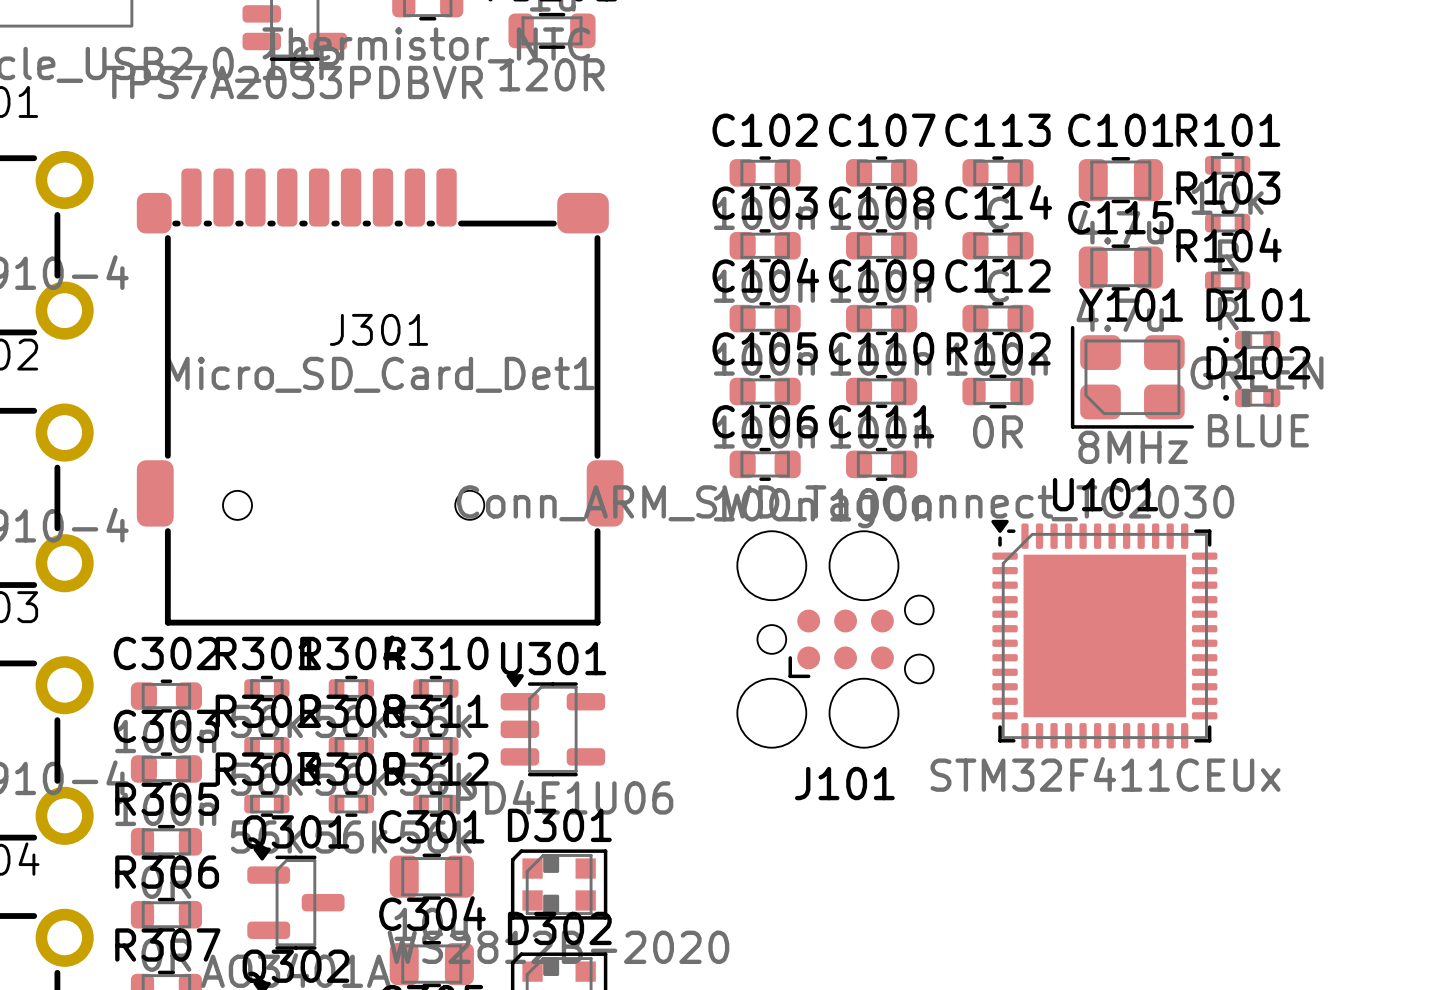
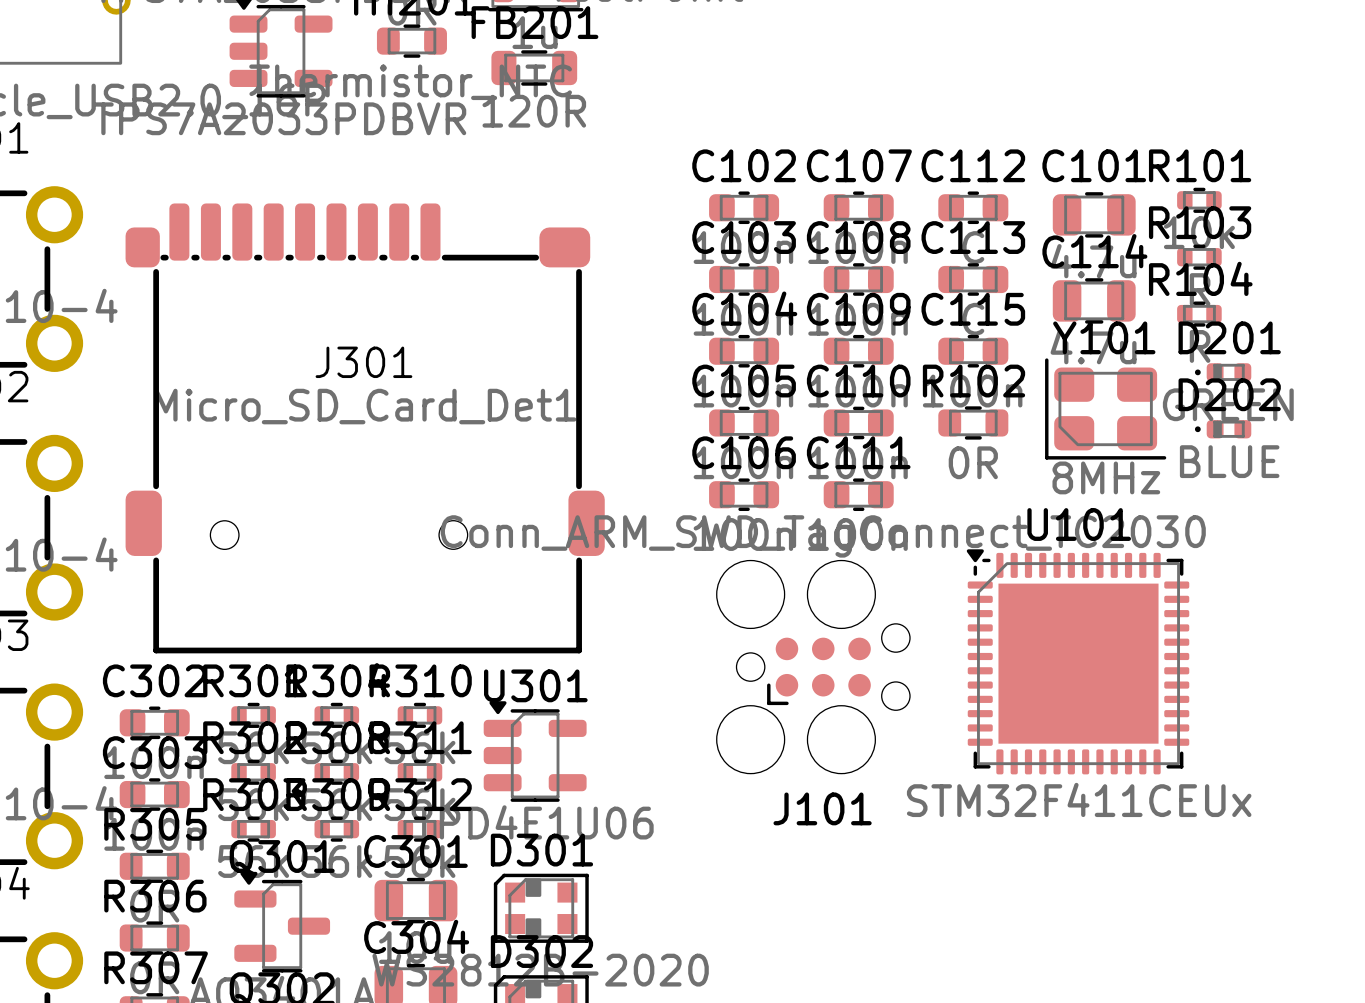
C113 name: C113 (998, 130) -> C112 (973, 165)
C114 name: C114 (998, 202) -> C113 (973, 237)
C115 name: C115 (1120, 217) -> C114 (1094, 251)
C112 name: C112 (998, 276) -> C115 (973, 309)
D101 name: D101 (1258, 305) -> D201 (1229, 337)
D102 name: D102 (1258, 362) -> D202 (1229, 394)

